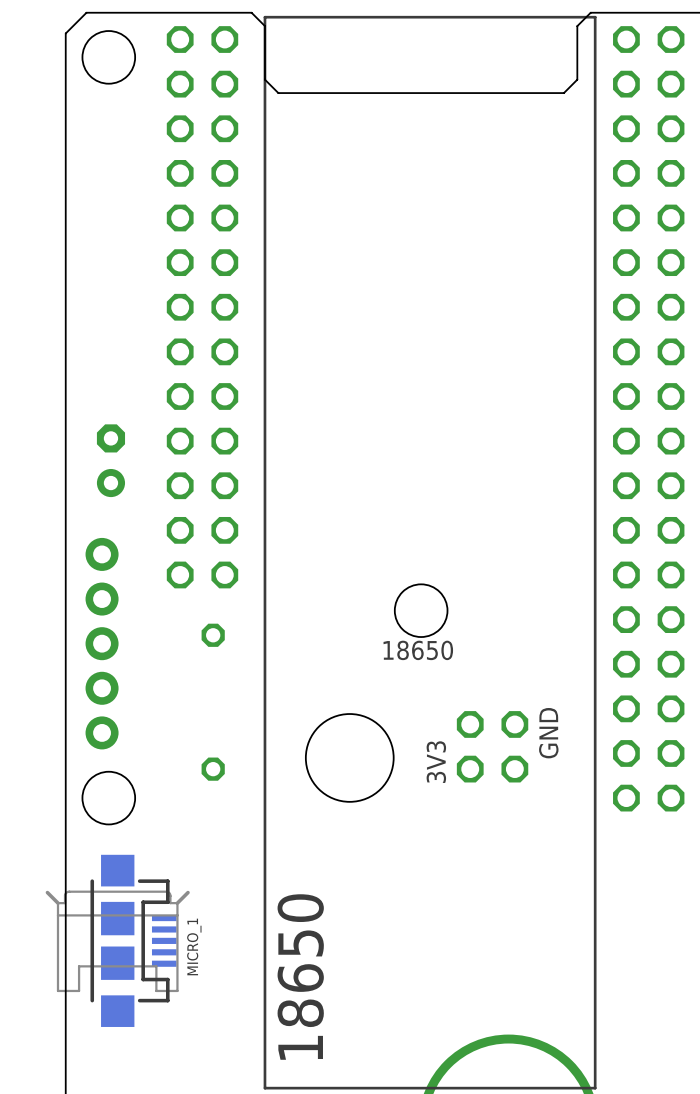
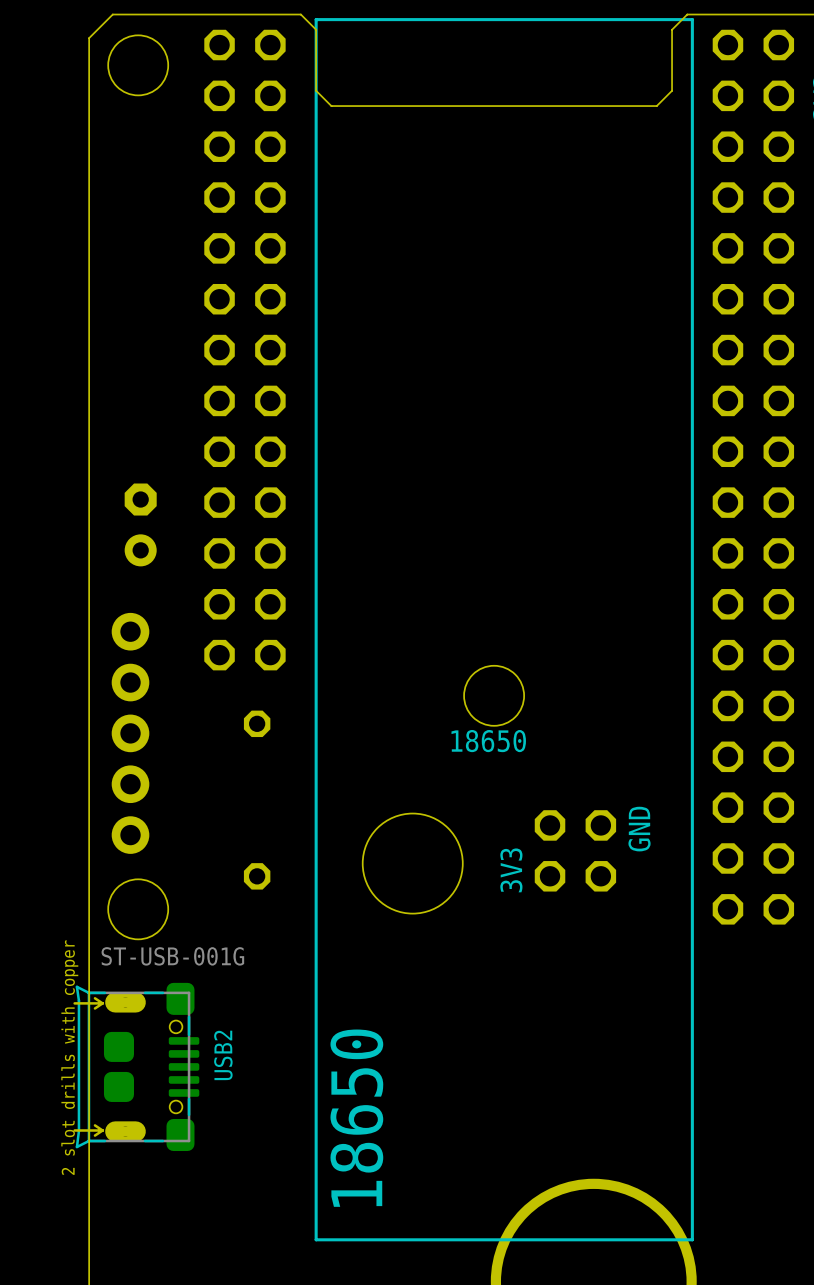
USB2: none -> ST-USB-001G (136, 1066)
MICRO_1: (117, 940) -> none

